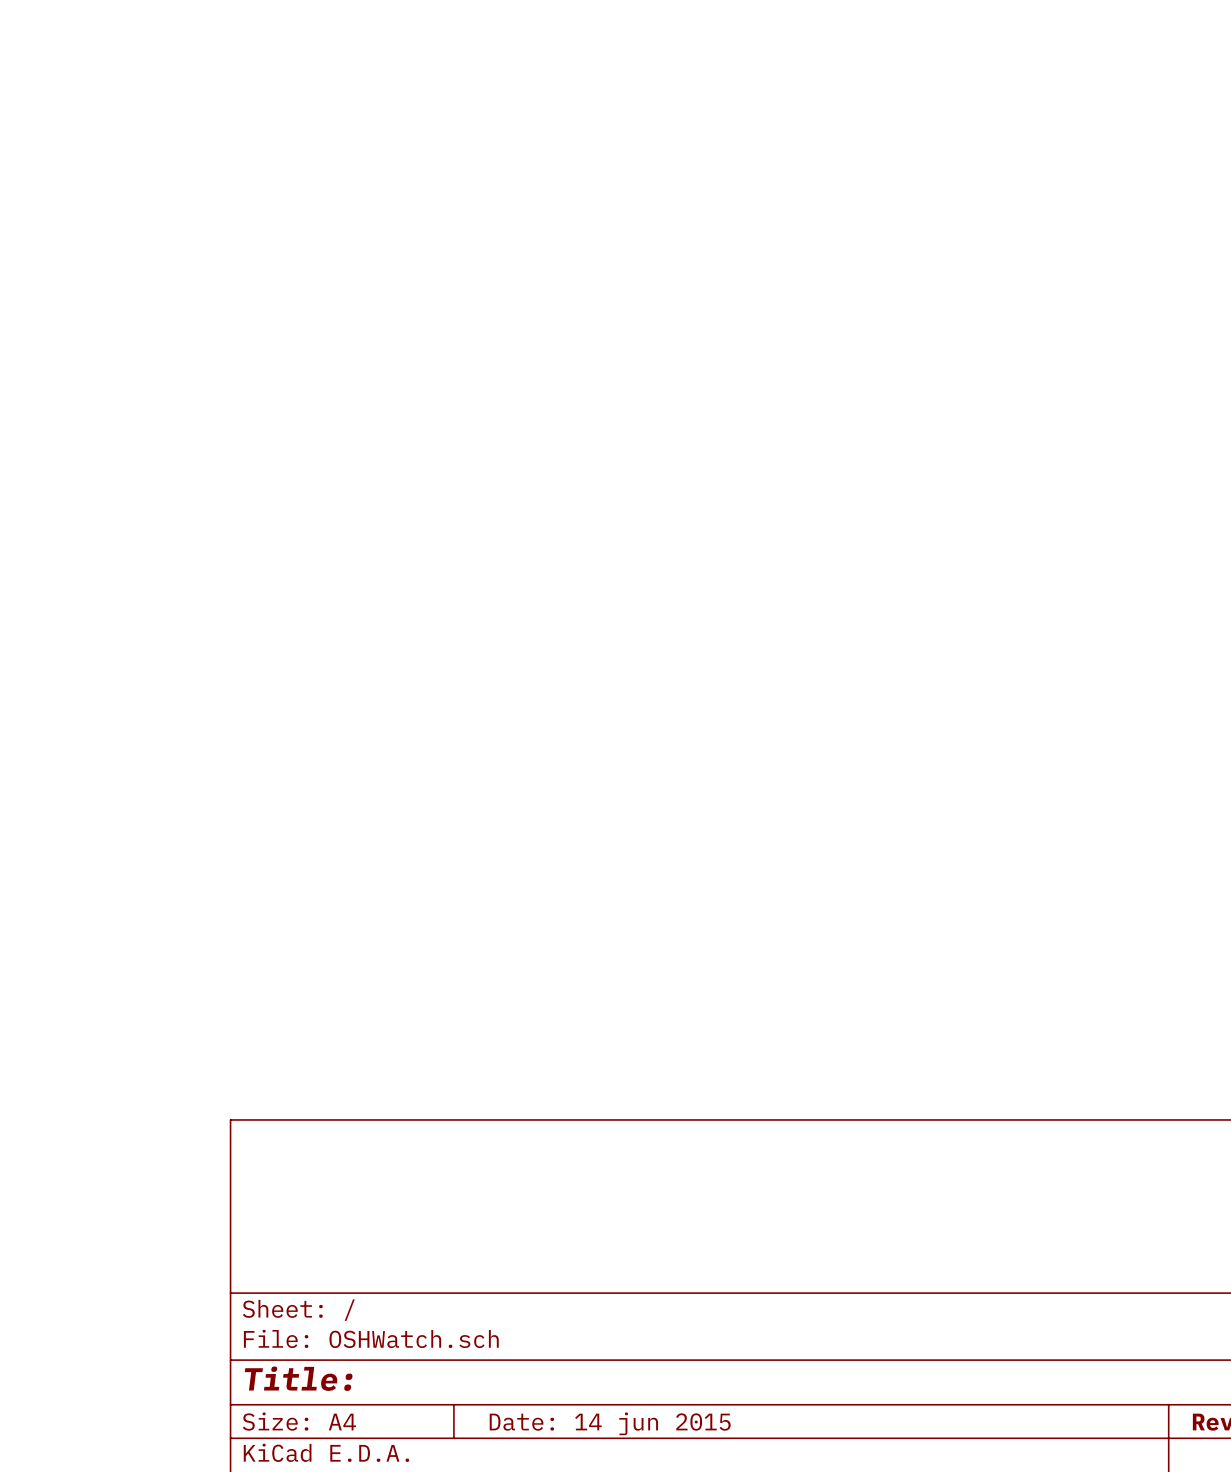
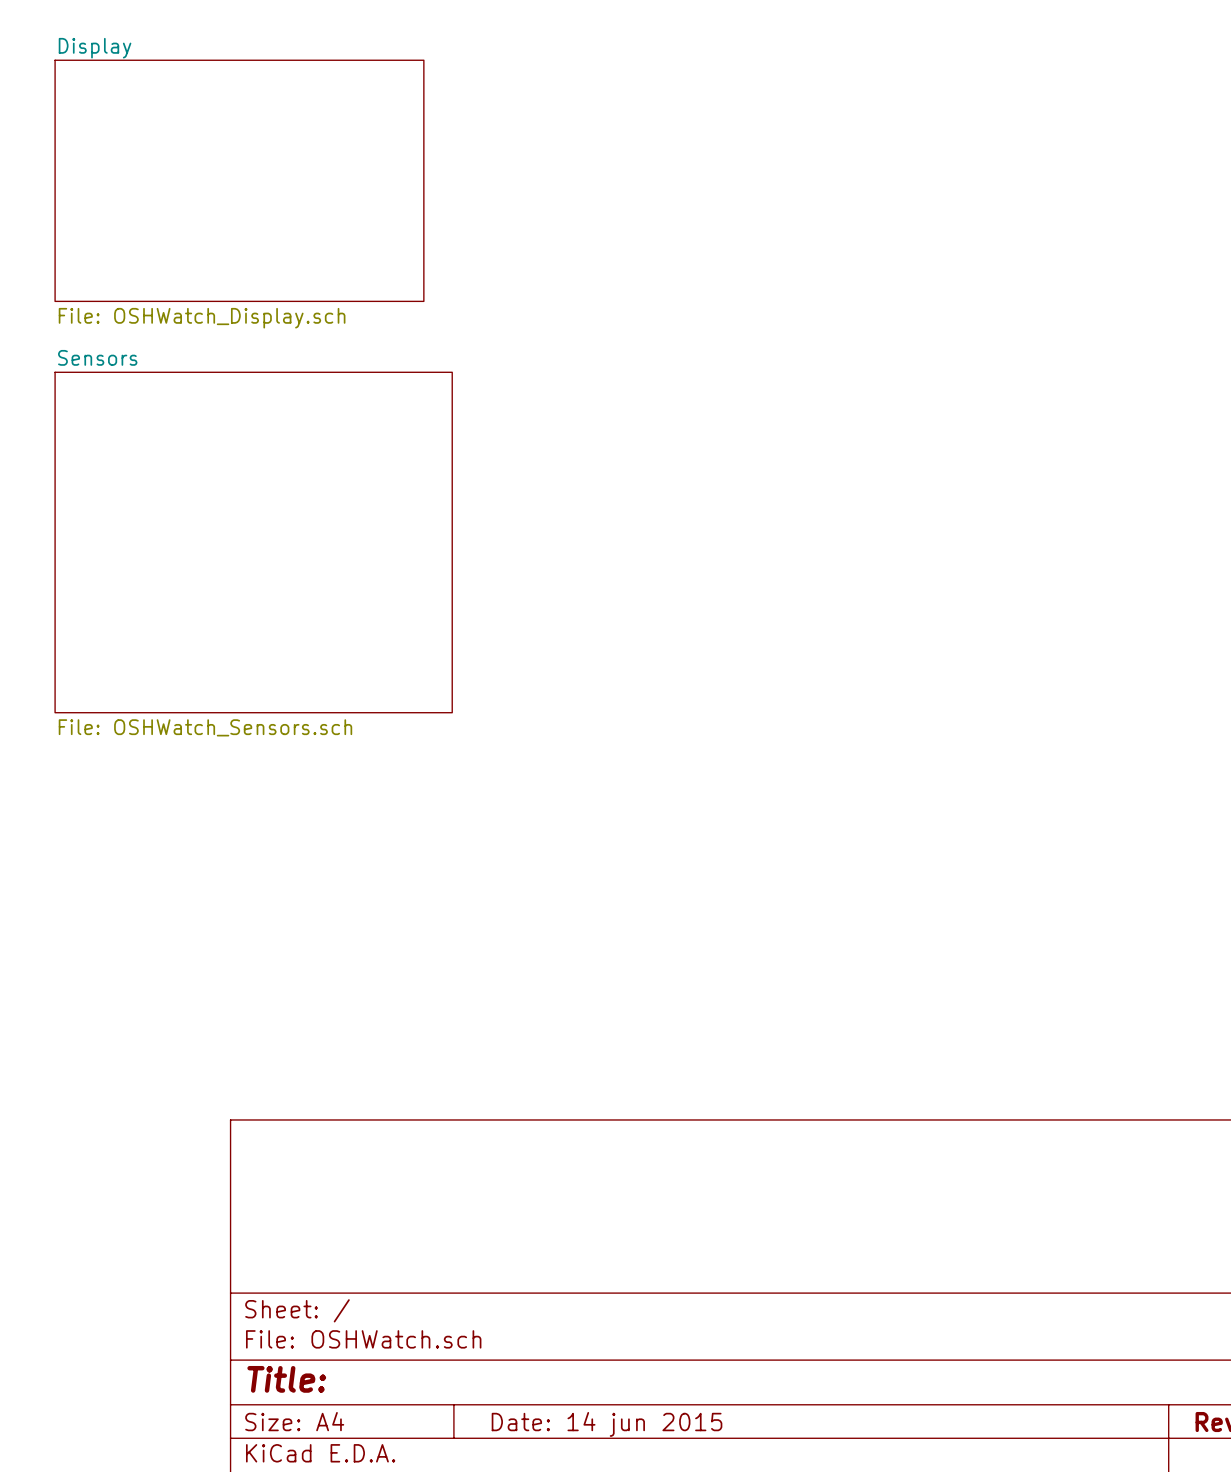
sheet Display: none -> File: OSHWatch_Display.sch (239, 180)
sheet Sensors: none -> File: OSHWatch_Sensors.sch (253, 542)

